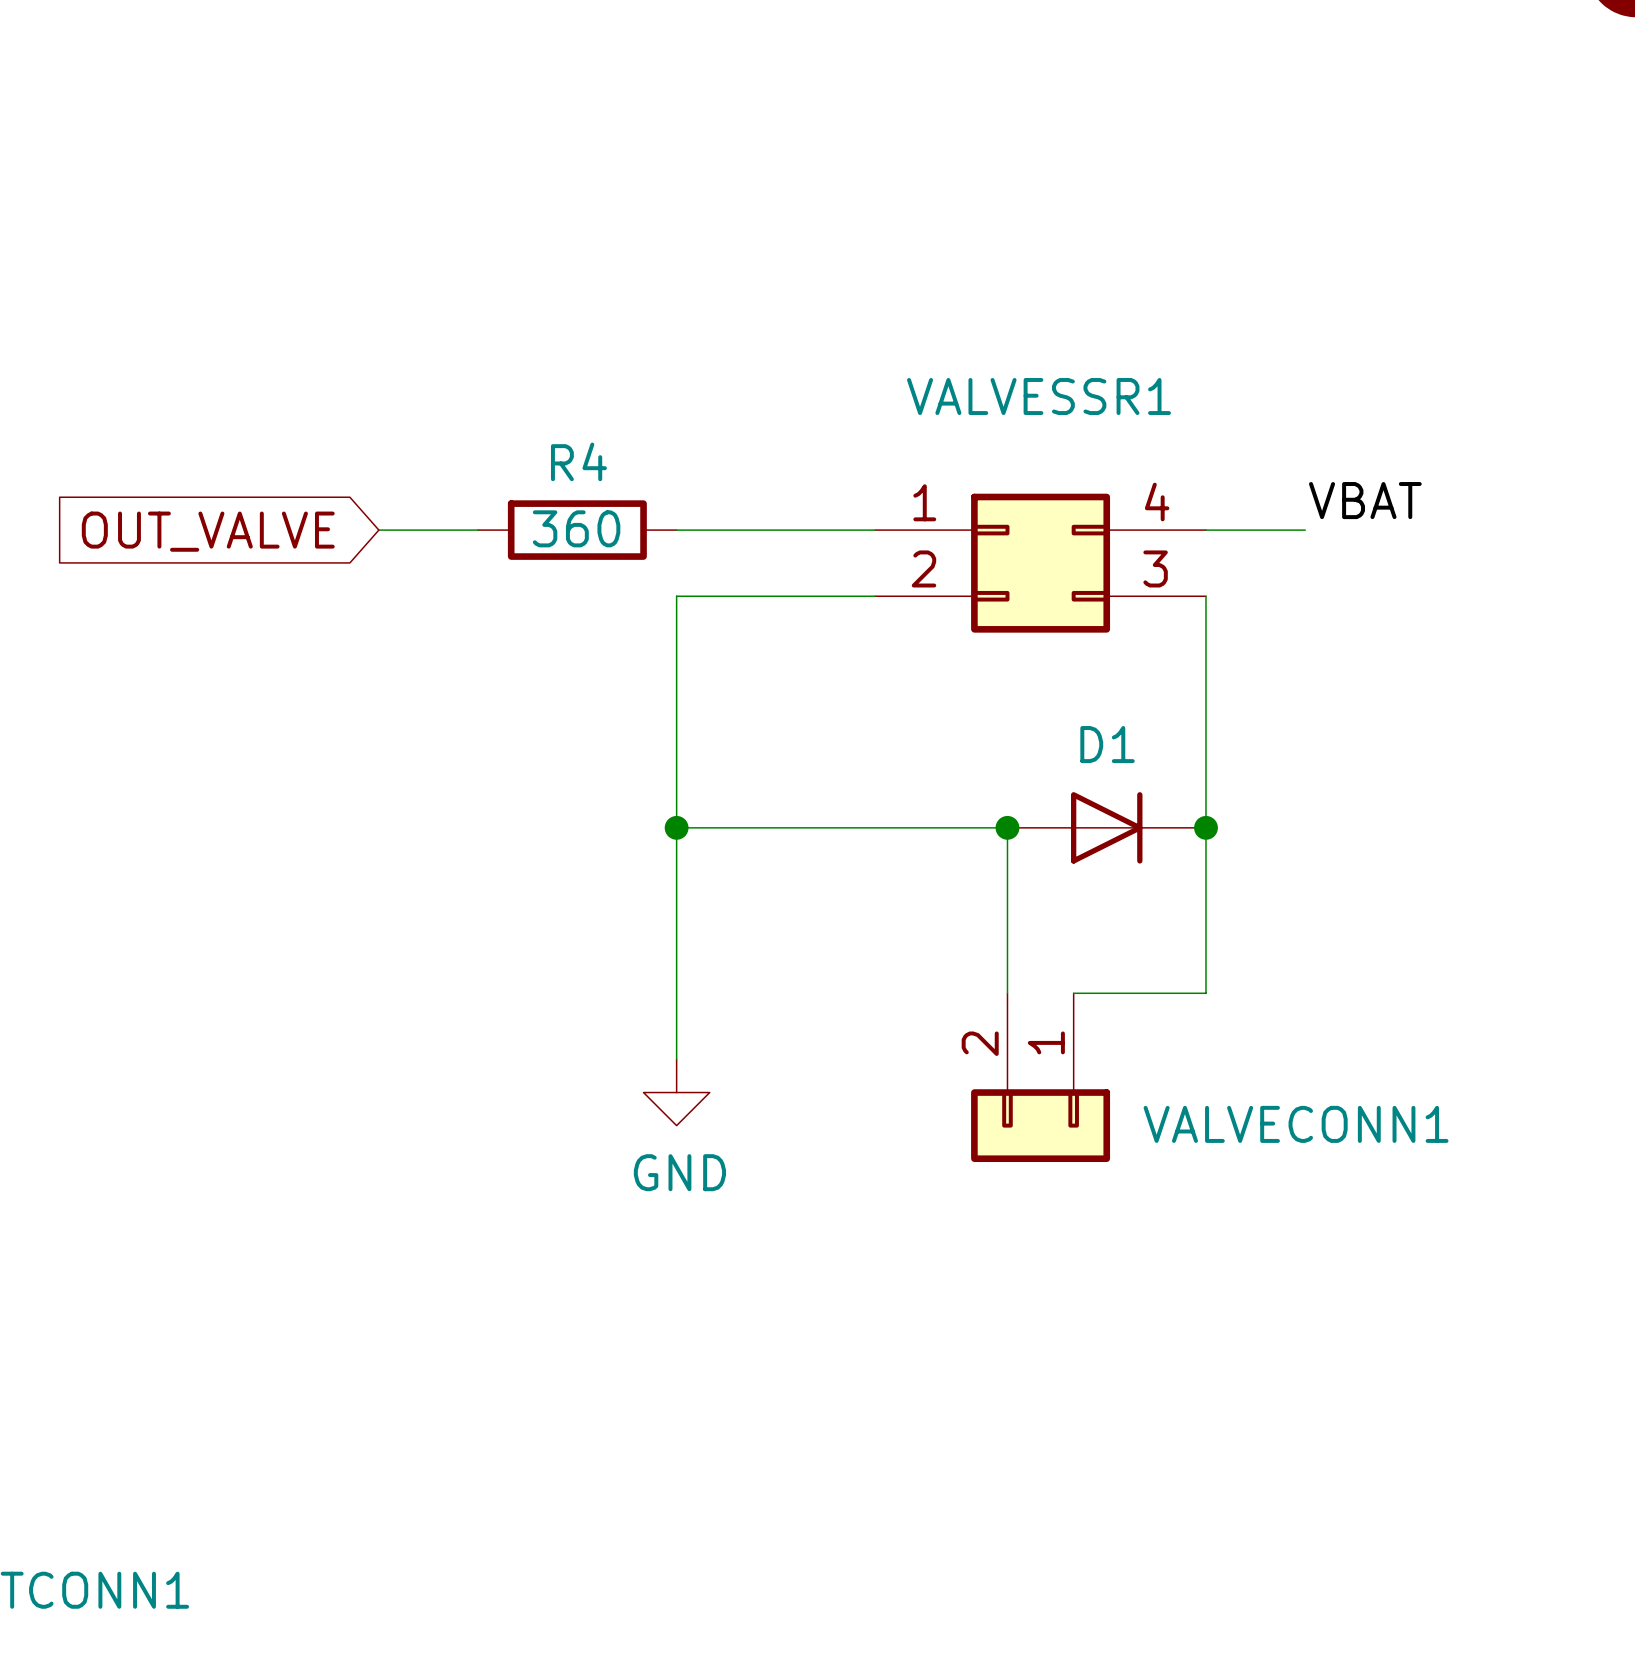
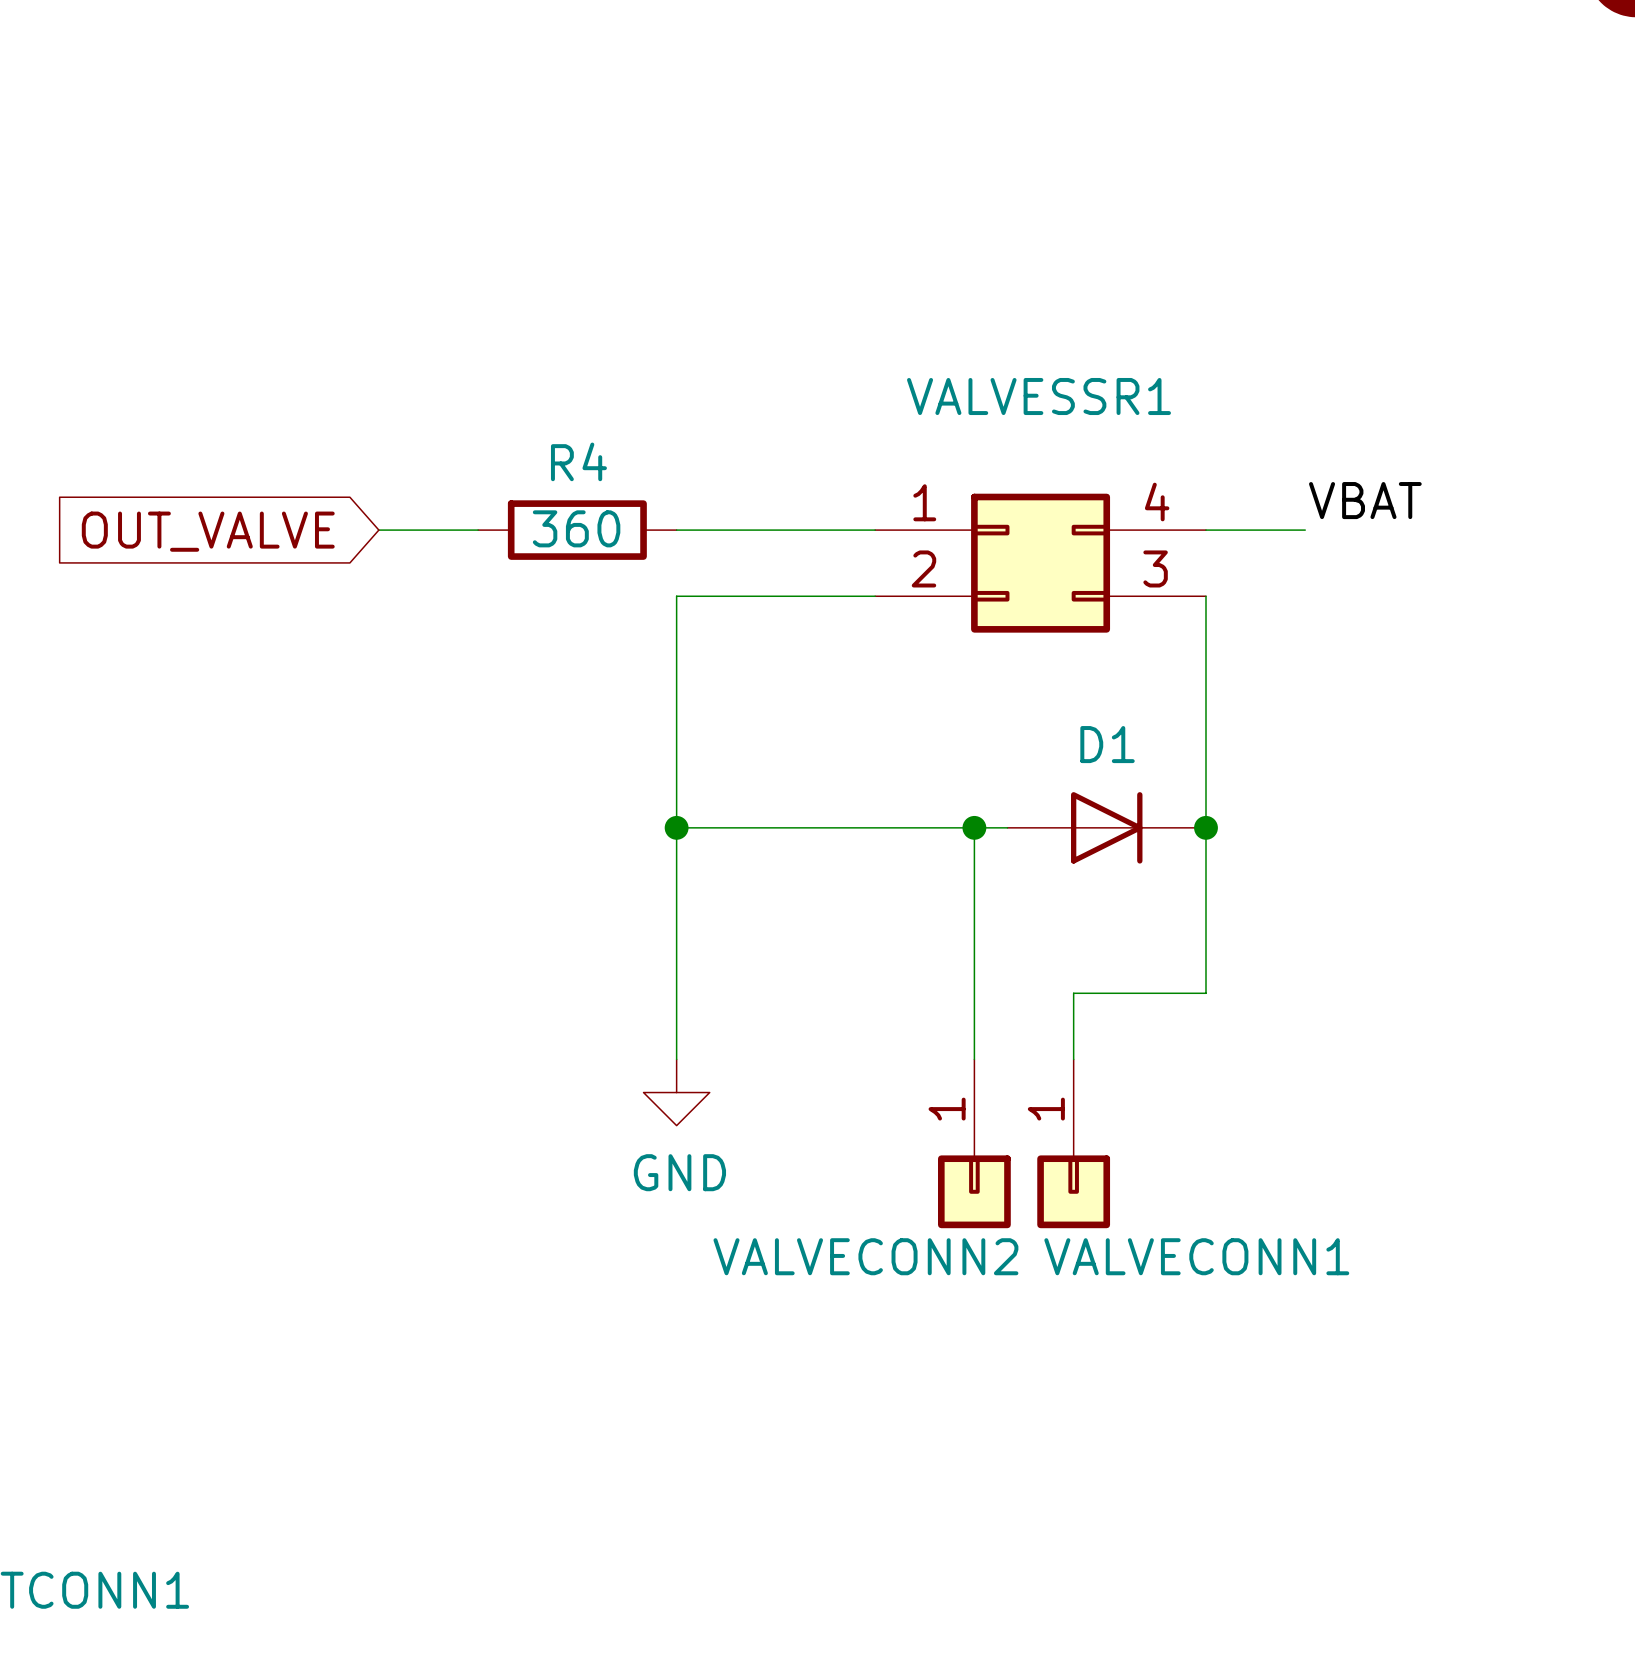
wire: none -> (974, 827) (974, 1059)
wire: (1007, 827) (1007, 993) -> none
junction position: (1007, 827) -> (974, 827)
VALVECONN1 symbol: [971, 993, 1111, 1163] -> [1037, 1059, 1111, 1229]
VALVECONN1 name position: VALVECONN1 (1296, 1124) -> VALVECONN1 (1196, 1256)
VALVECONN2: none -> (974, 1143)

